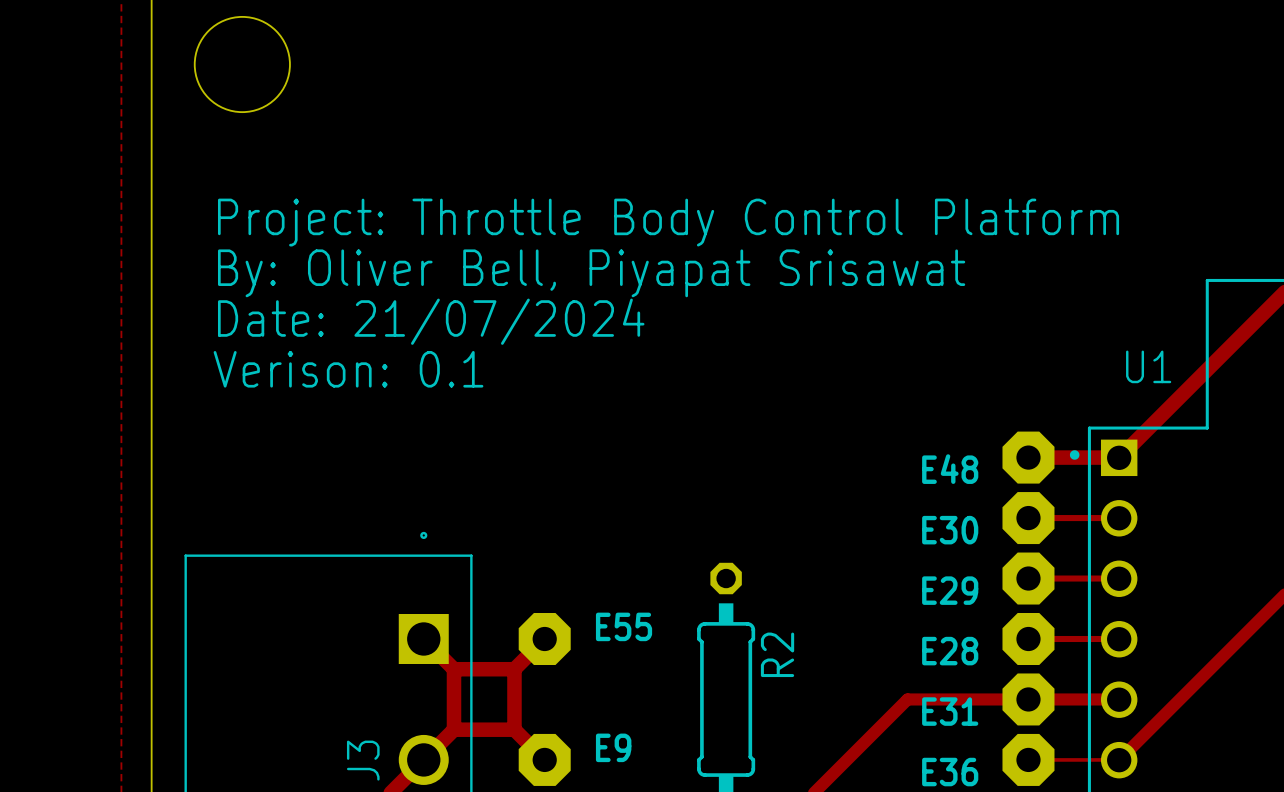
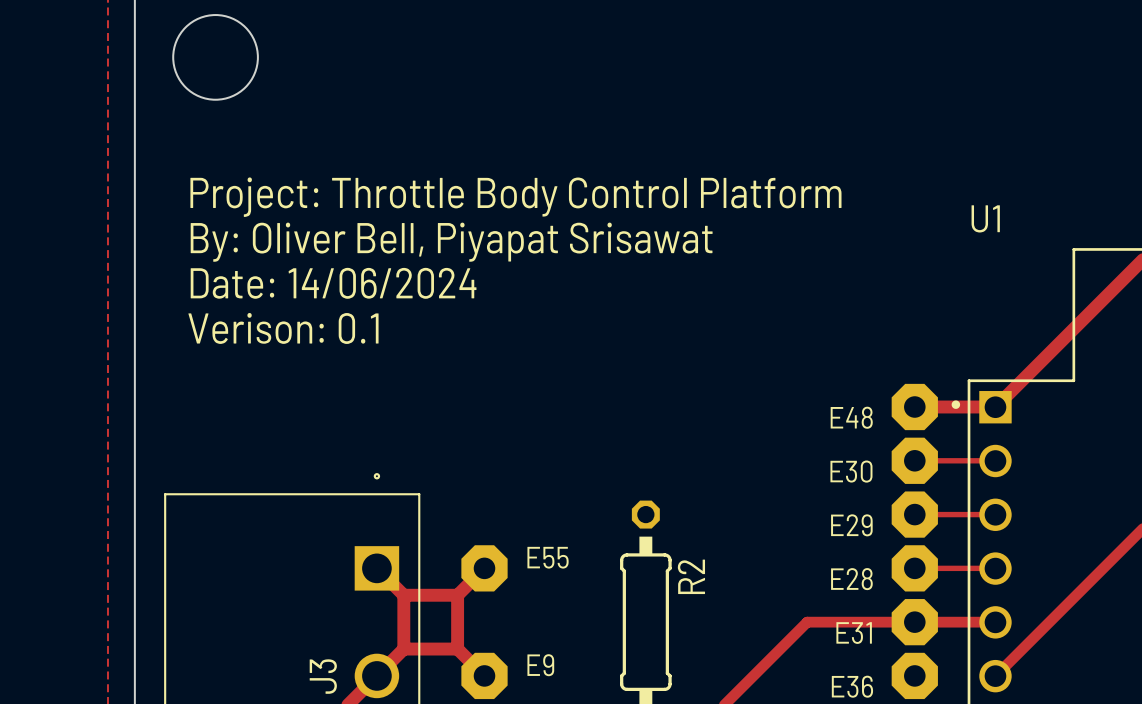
text: Date: 21/07/2024 (431, 321) -> Date: 14/06/2024 (333, 283)
U1 name position: U1 (1148, 366) -> U1 (985, 218)
top track: (1028, 759) (1118, 759) -> none

